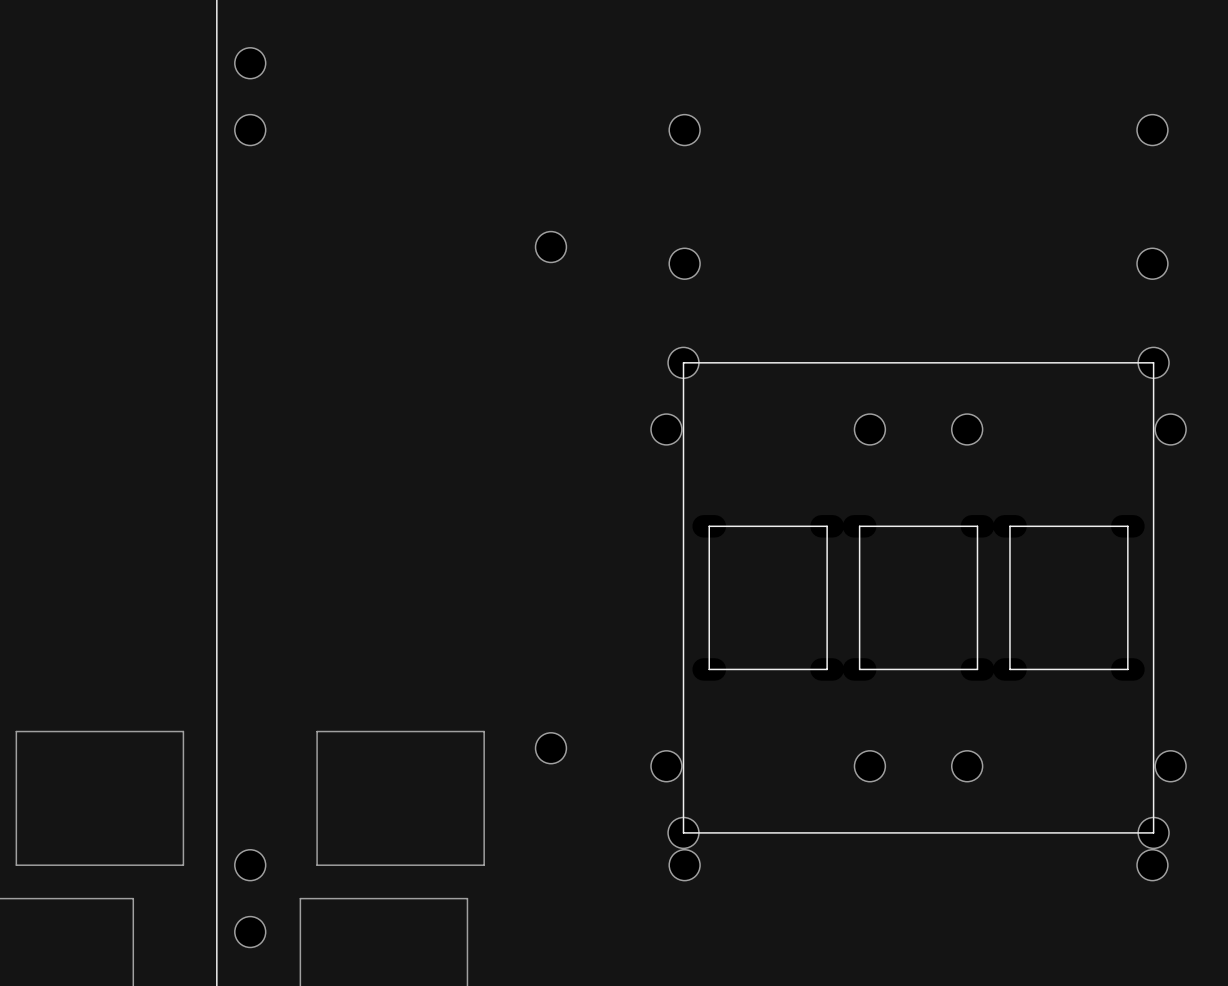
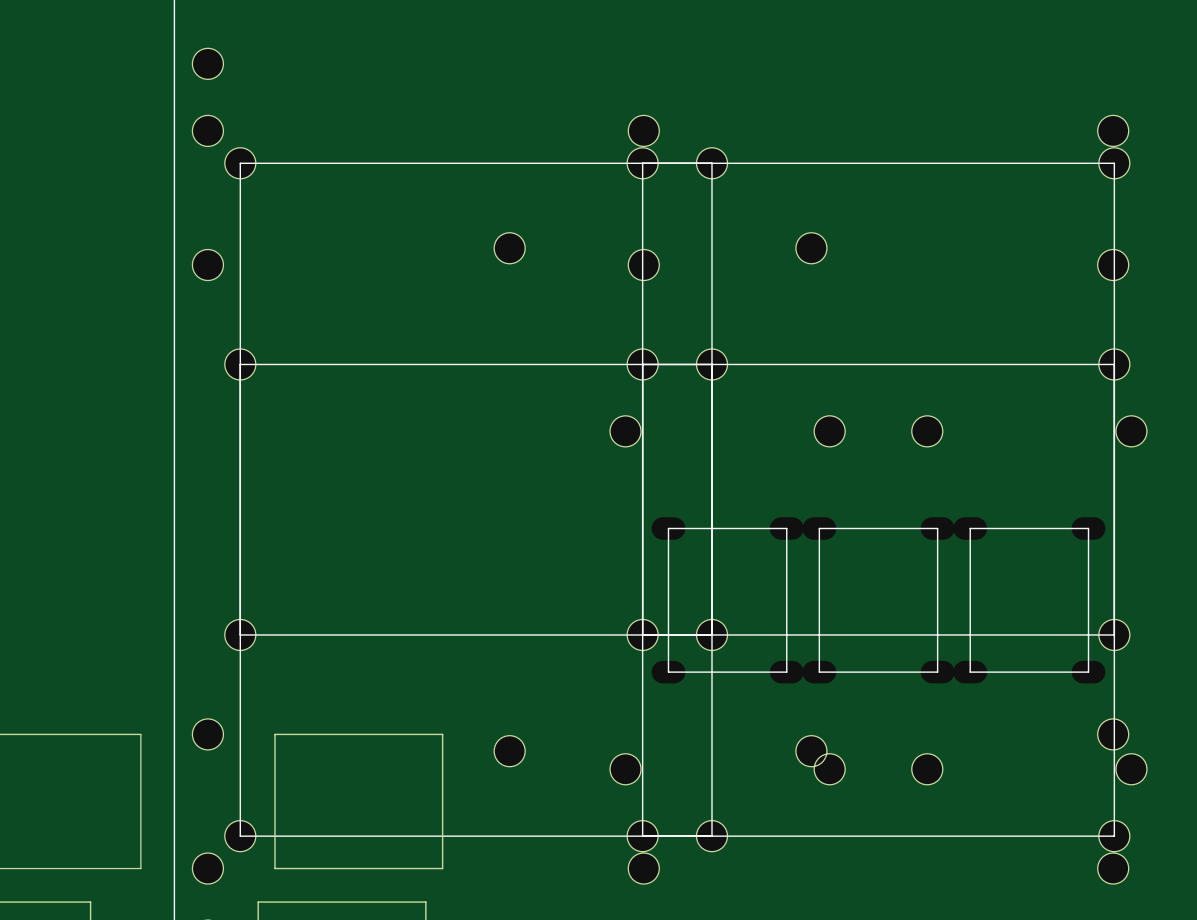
part: none -> (811, 248)
part: none -> (207, 265)
part: none -> (476, 399)
part: none -> (878, 399)
part: none -> (476, 600)
part: none -> (207, 734)
part: none -> (1113, 734)
part: none -> (811, 751)

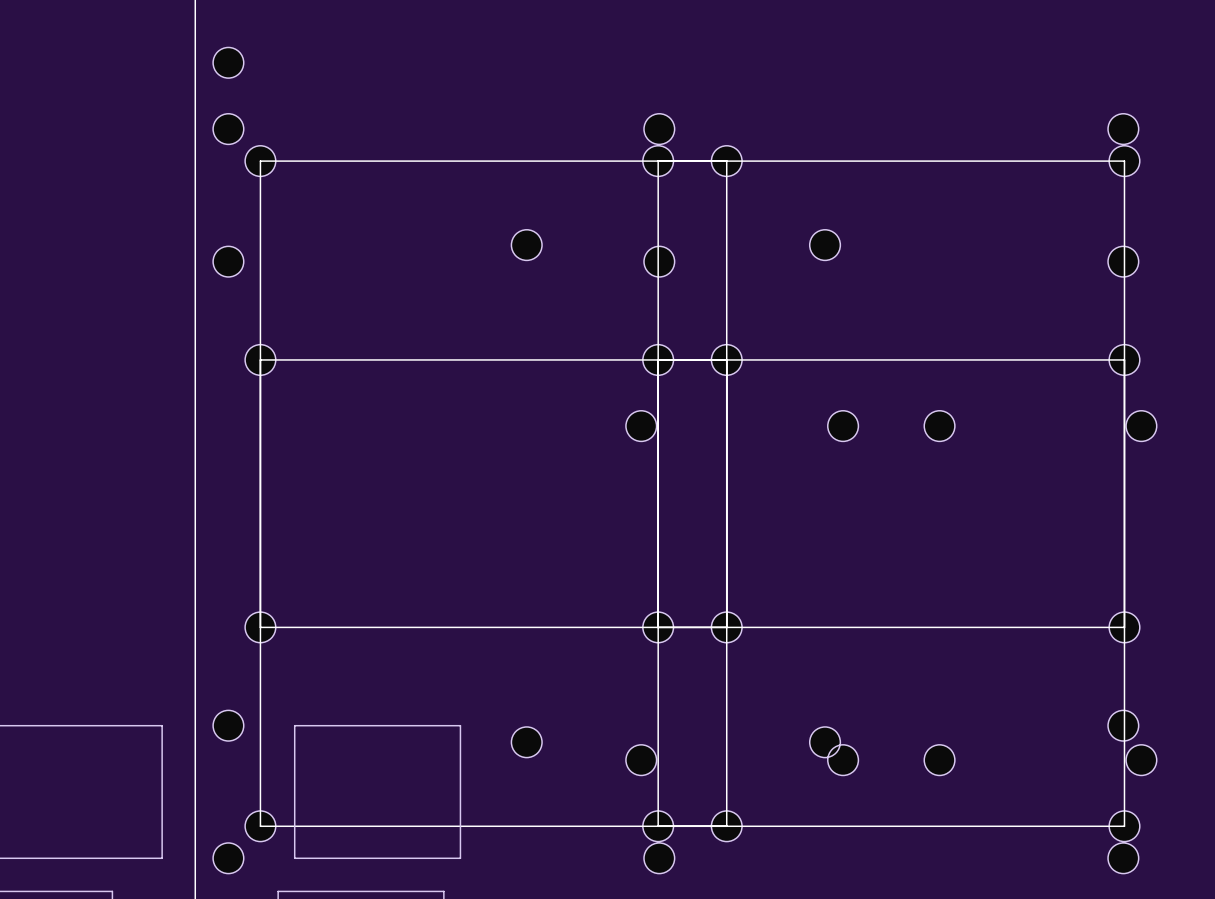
part: (727, 600) -> none
part: (878, 600) -> none
part: (1029, 600) -> none

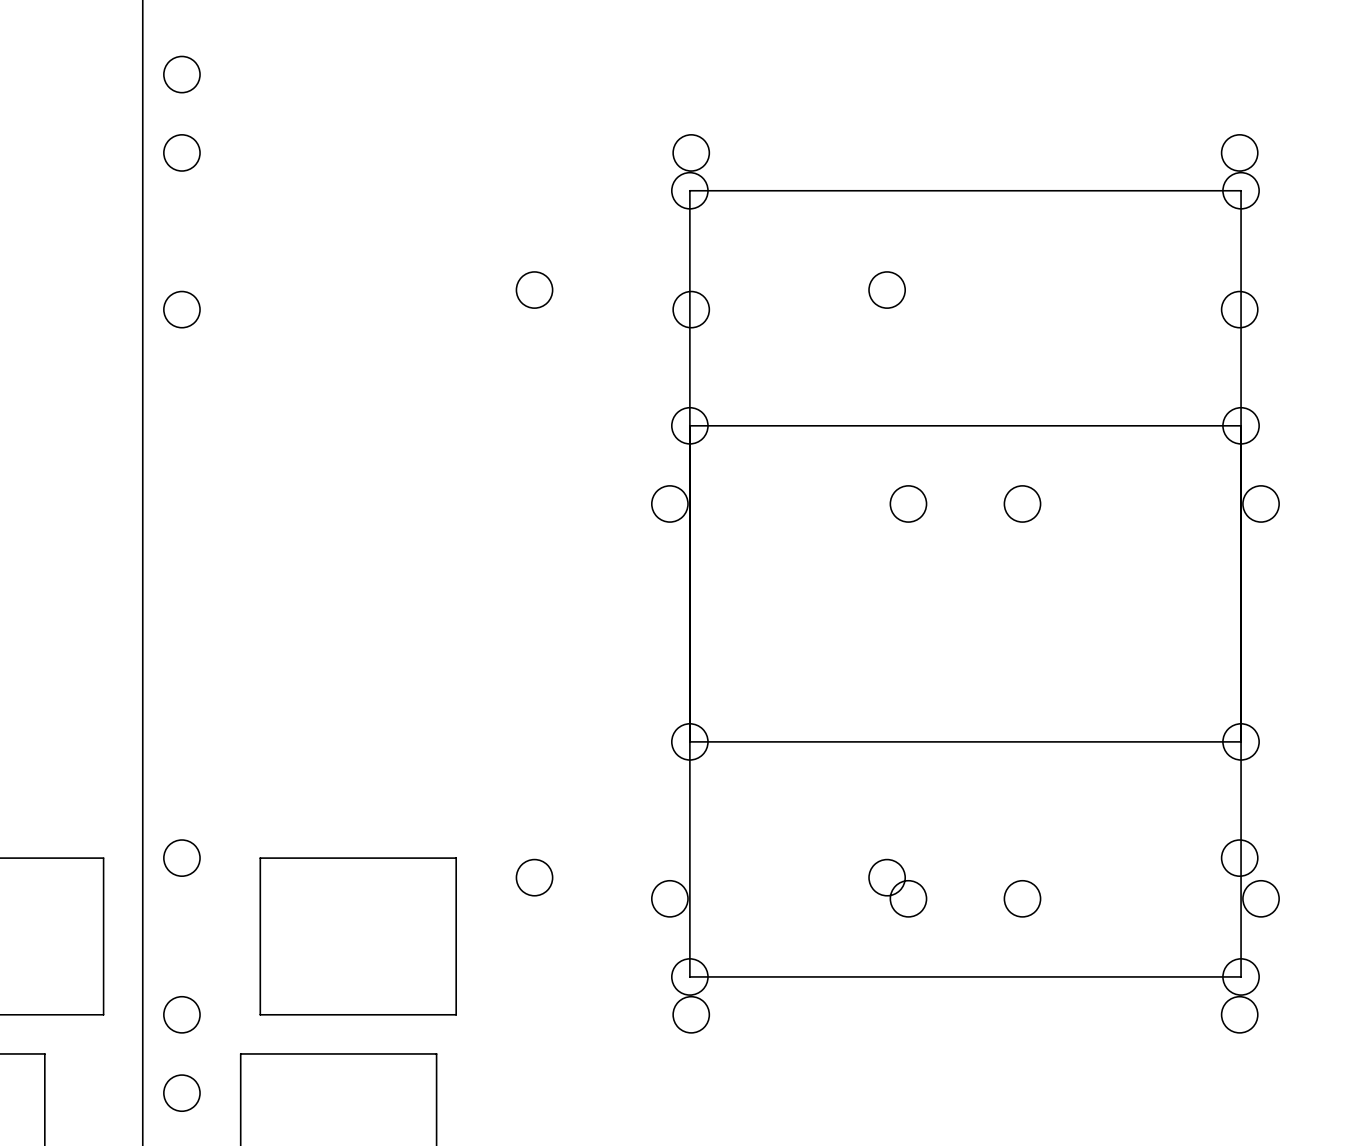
part: (493, 394) -> none
part: (493, 593) -> none

